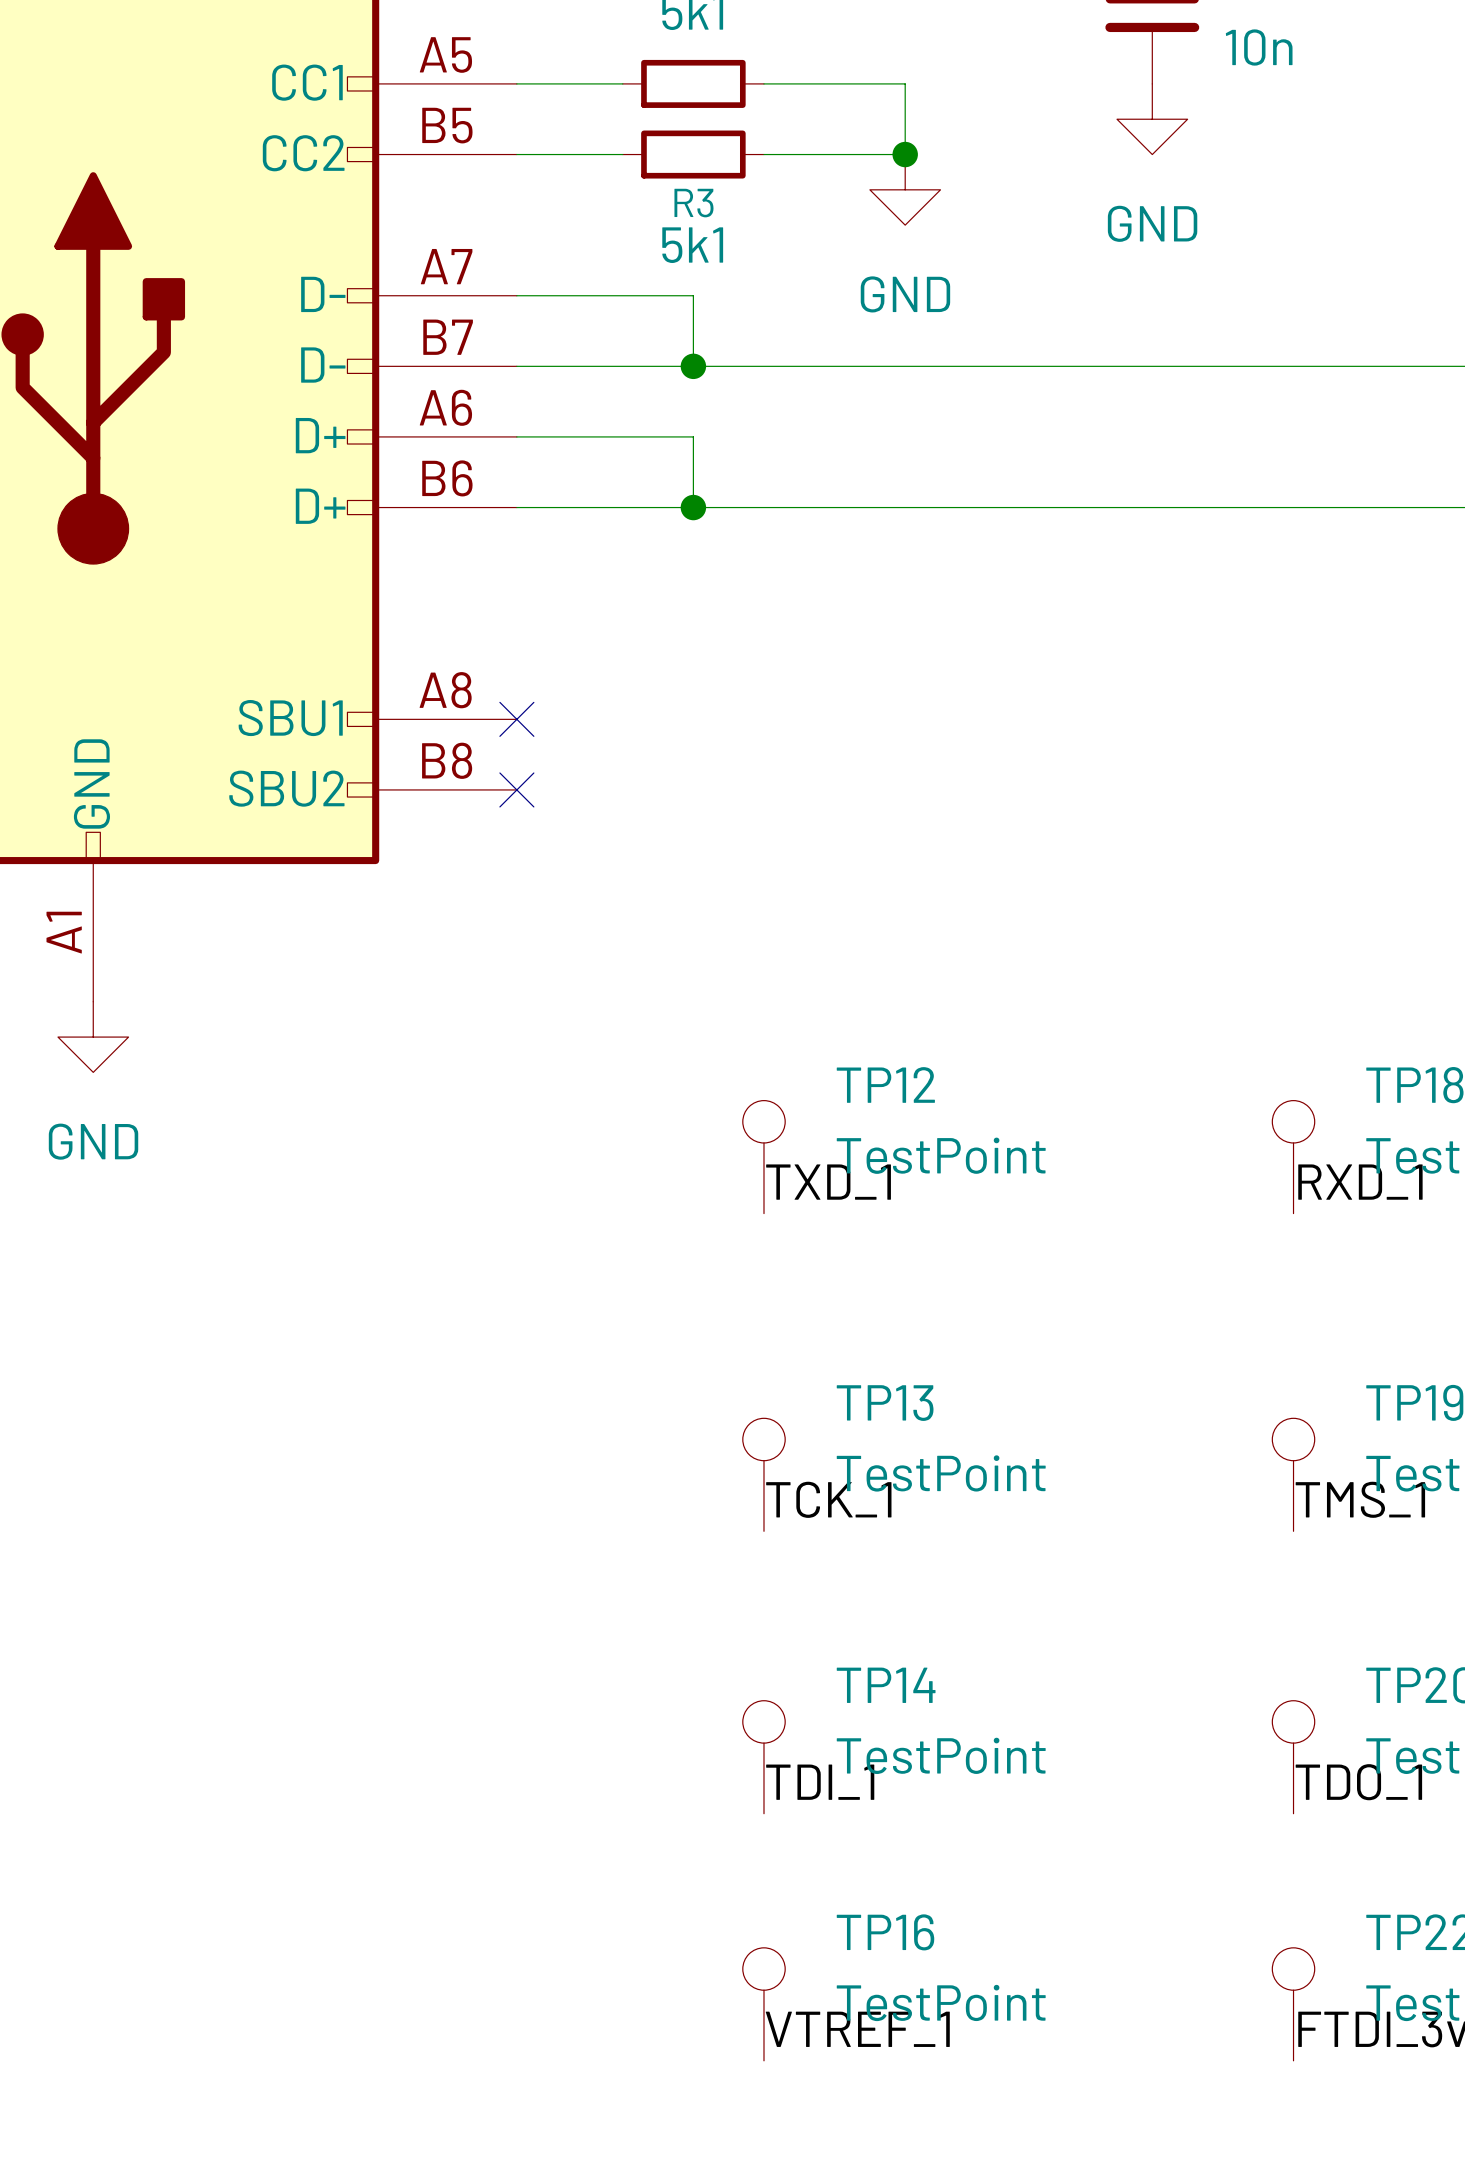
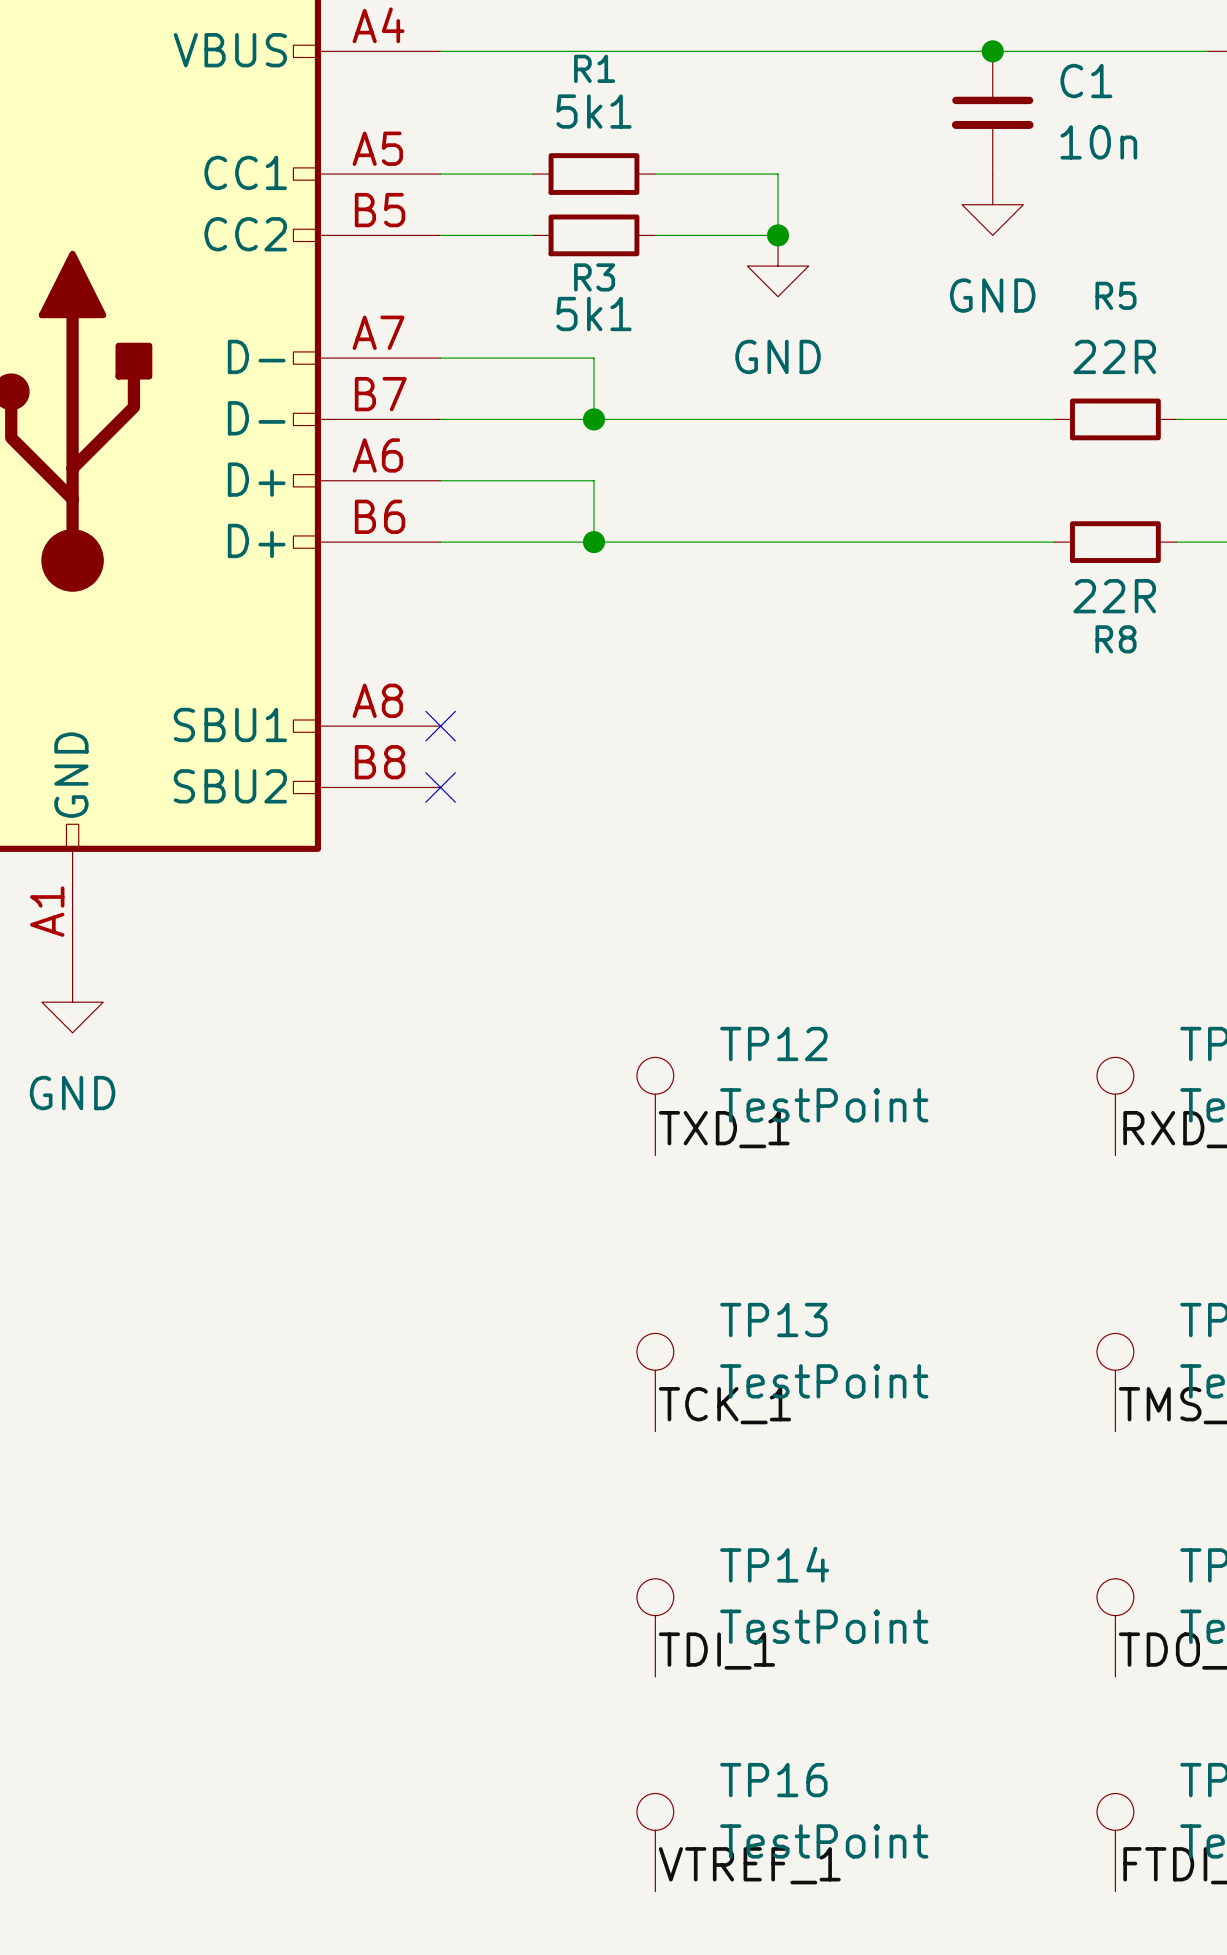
wire: (1222, 366) (1364, 366) -> none
R5: none -> 22R (1115, 419)
wire: (1222, 507) (1364, 507) -> none
R8: none -> 22R (1115, 542)

